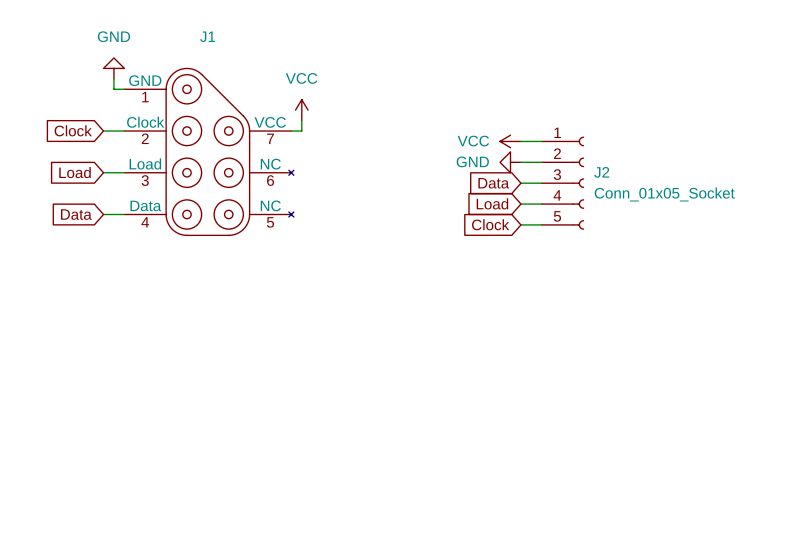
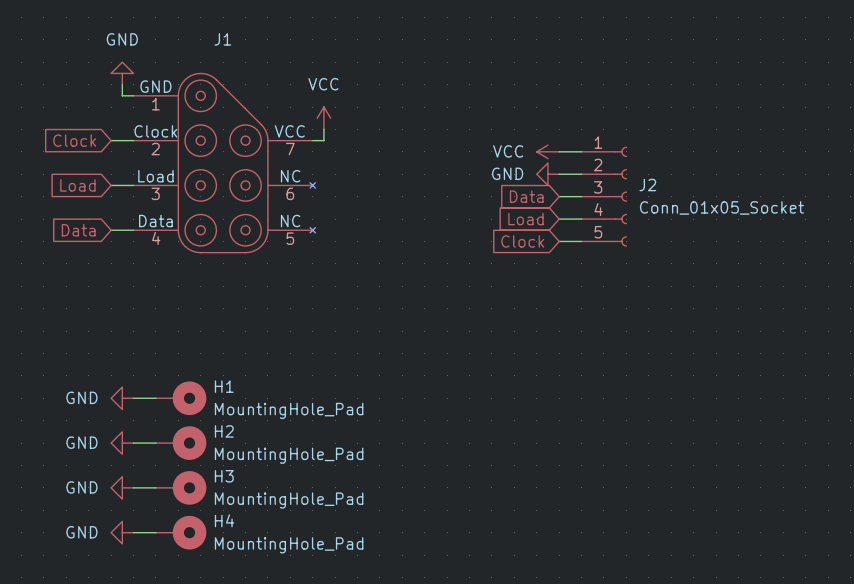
power symbol: none -> GND (122, 398)
wire: none -> (133, 398) (155, 398)
H1: none -> MountingHole_Pad (181, 398)
power symbol: none -> GND (122, 443)
wire: none -> (133, 443) (155, 443)
H2: none -> MountingHole_Pad (181, 443)
power symbol: none -> GND (122, 487)
wire: none -> (133, 487) (155, 487)
H3: none -> MountingHole_Pad (181, 487)
power symbol: none -> GND (122, 532)
wire: none -> (133, 532) (155, 532)
H4: none -> MountingHole_Pad (181, 532)

